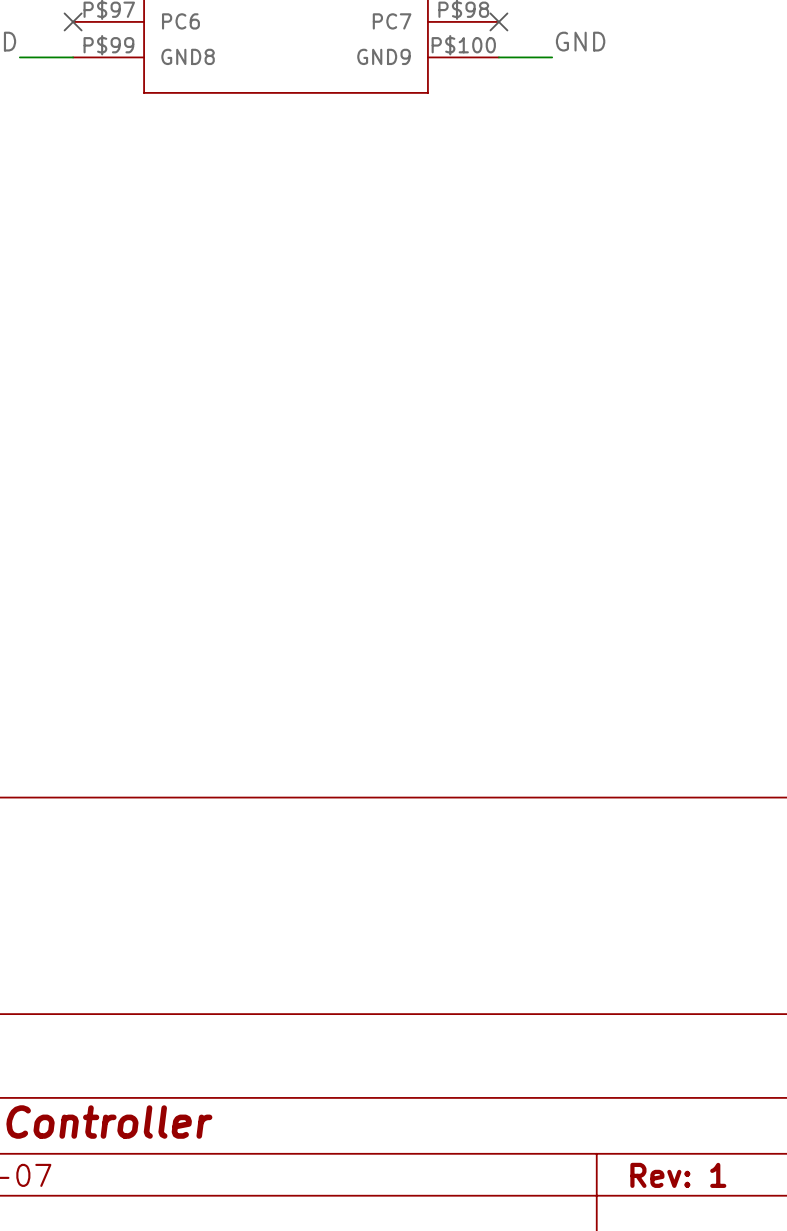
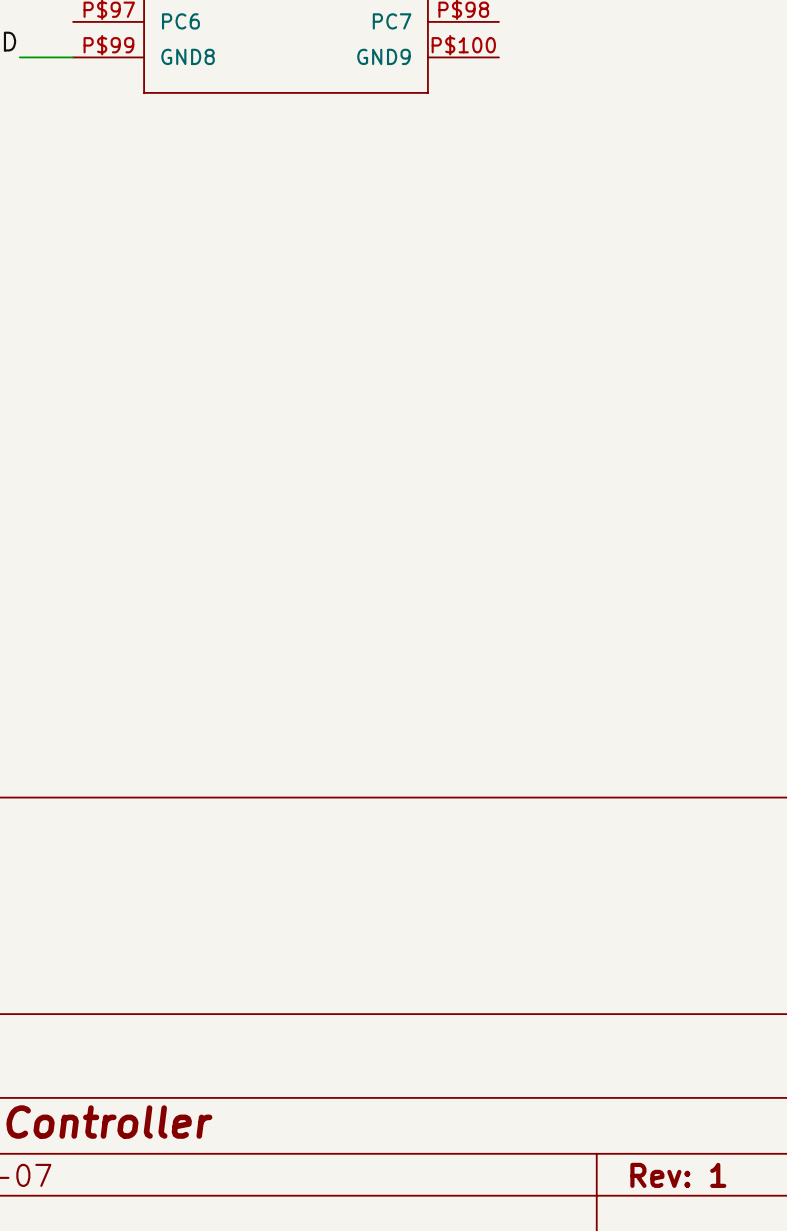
no-connect mark: (73, 21) -> none
no-connect mark: (498, 21) -> none
label: GND (580, 41) -> none
wire: (498, 57) (552, 57) -> none

